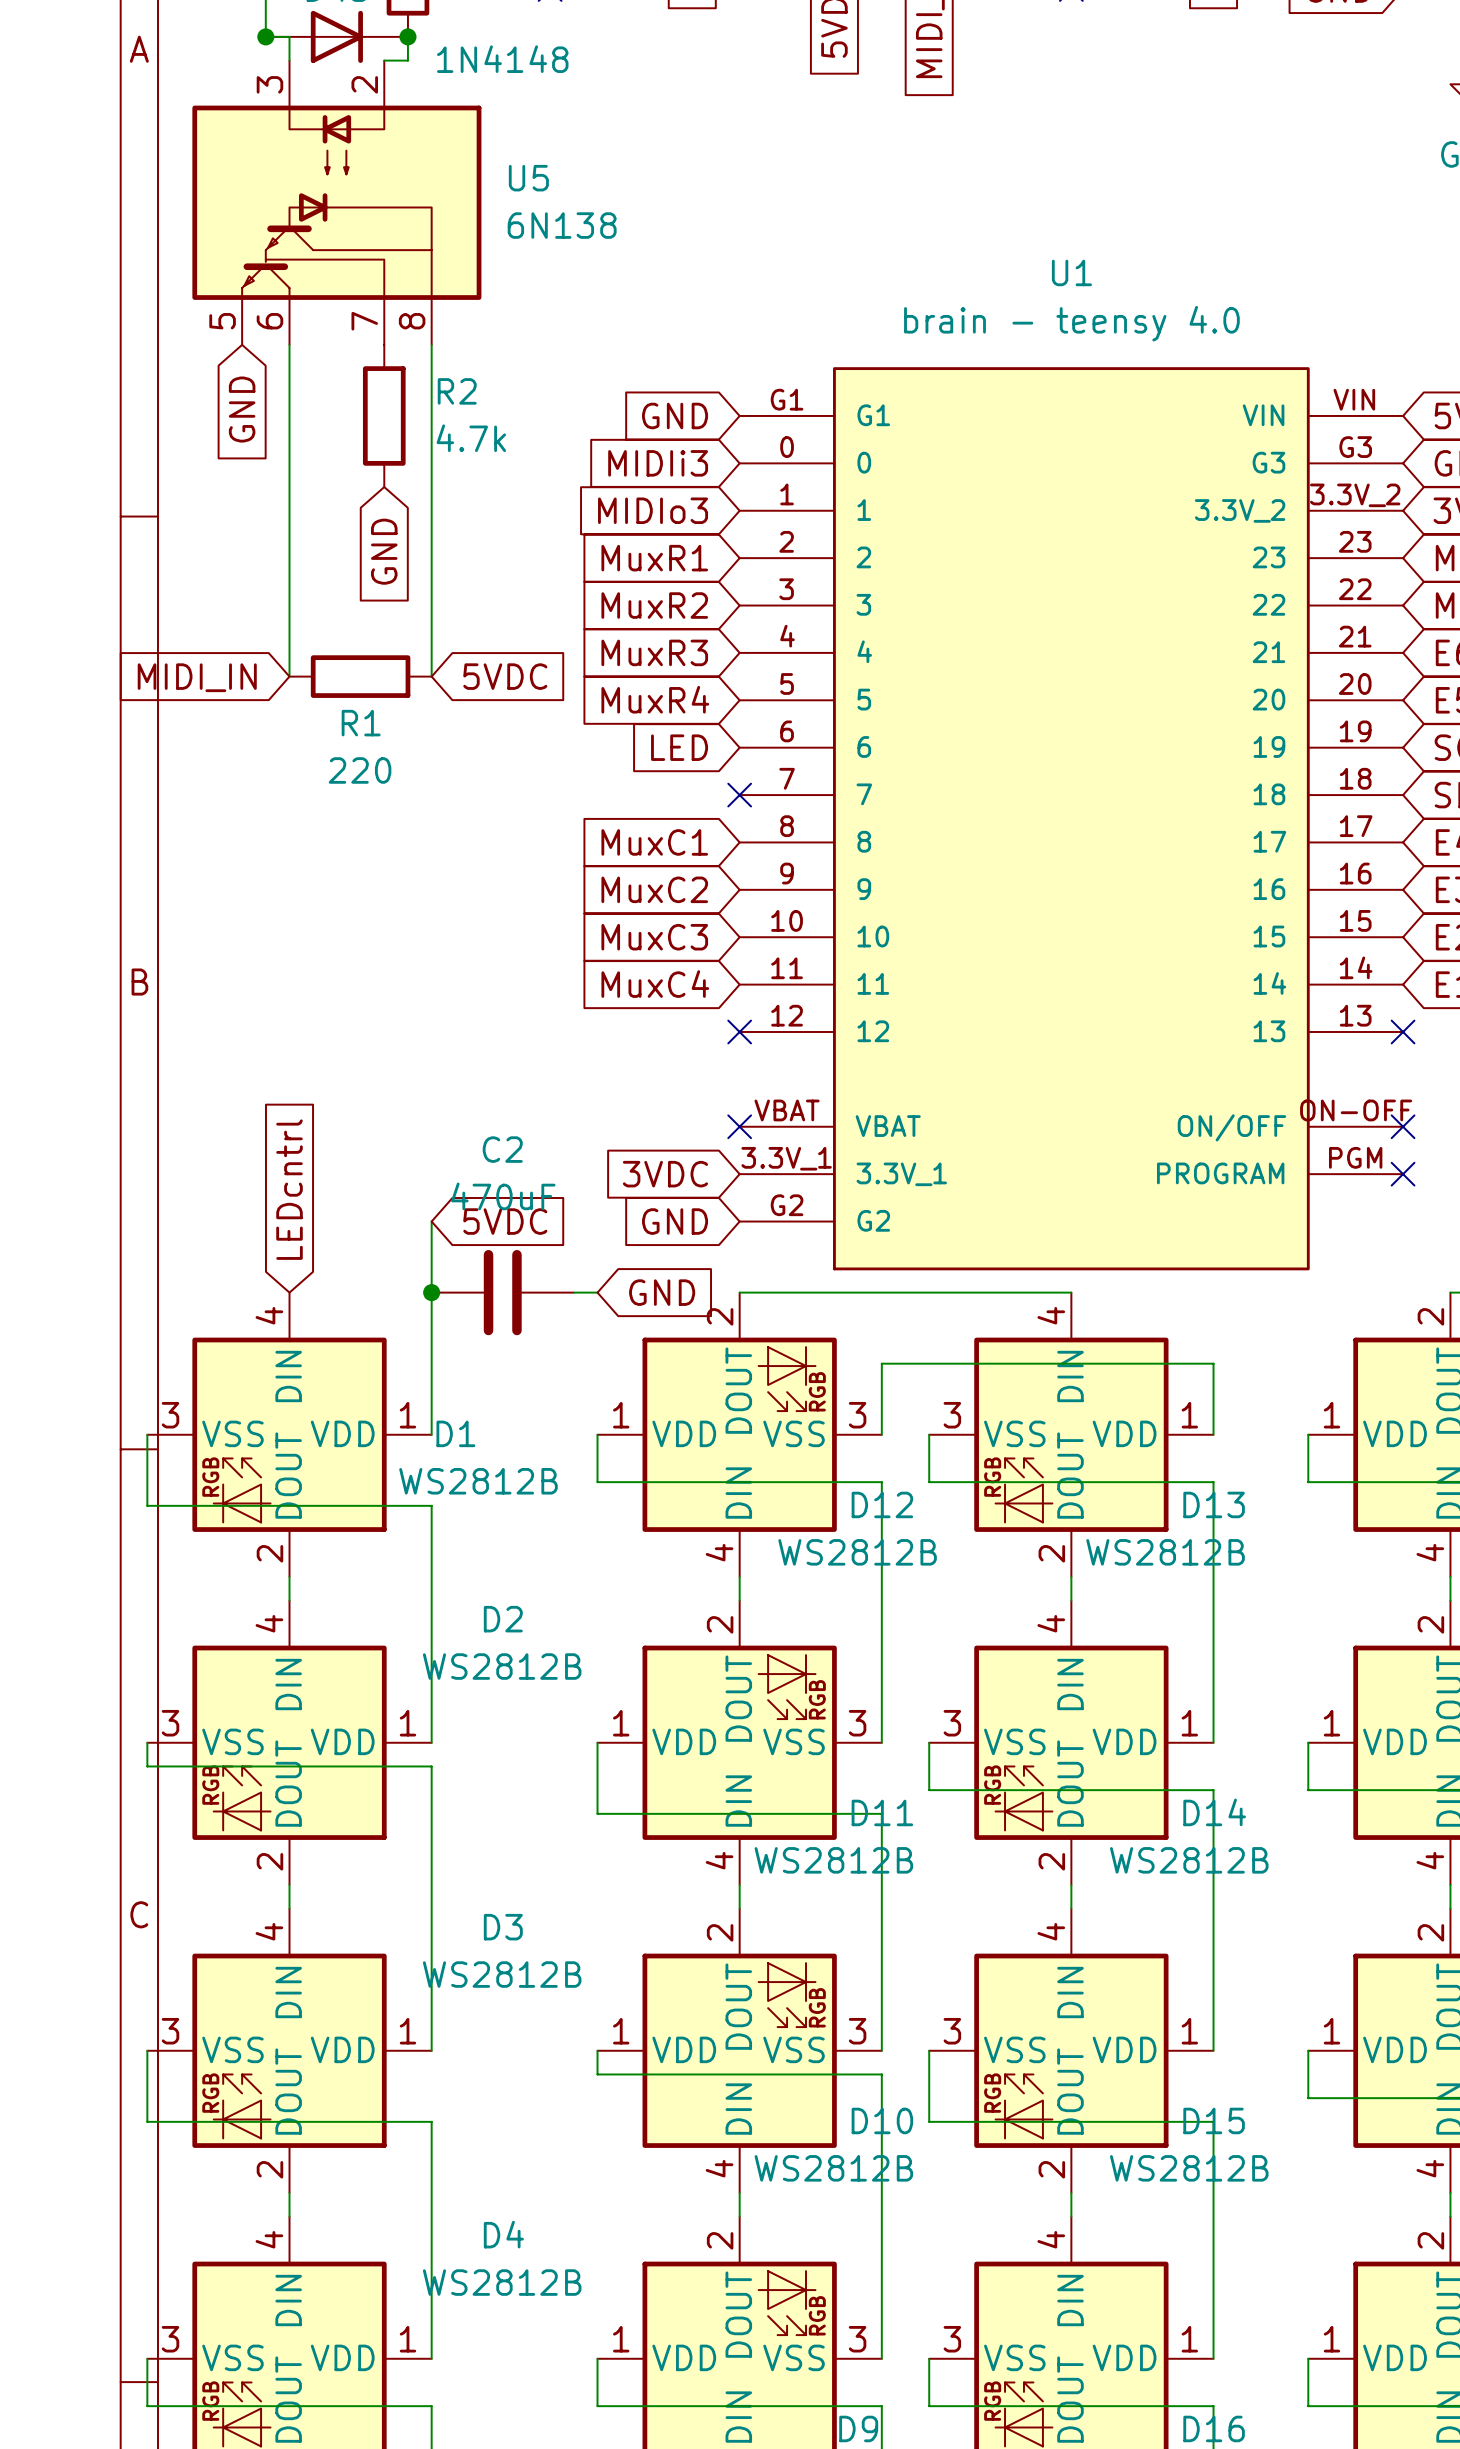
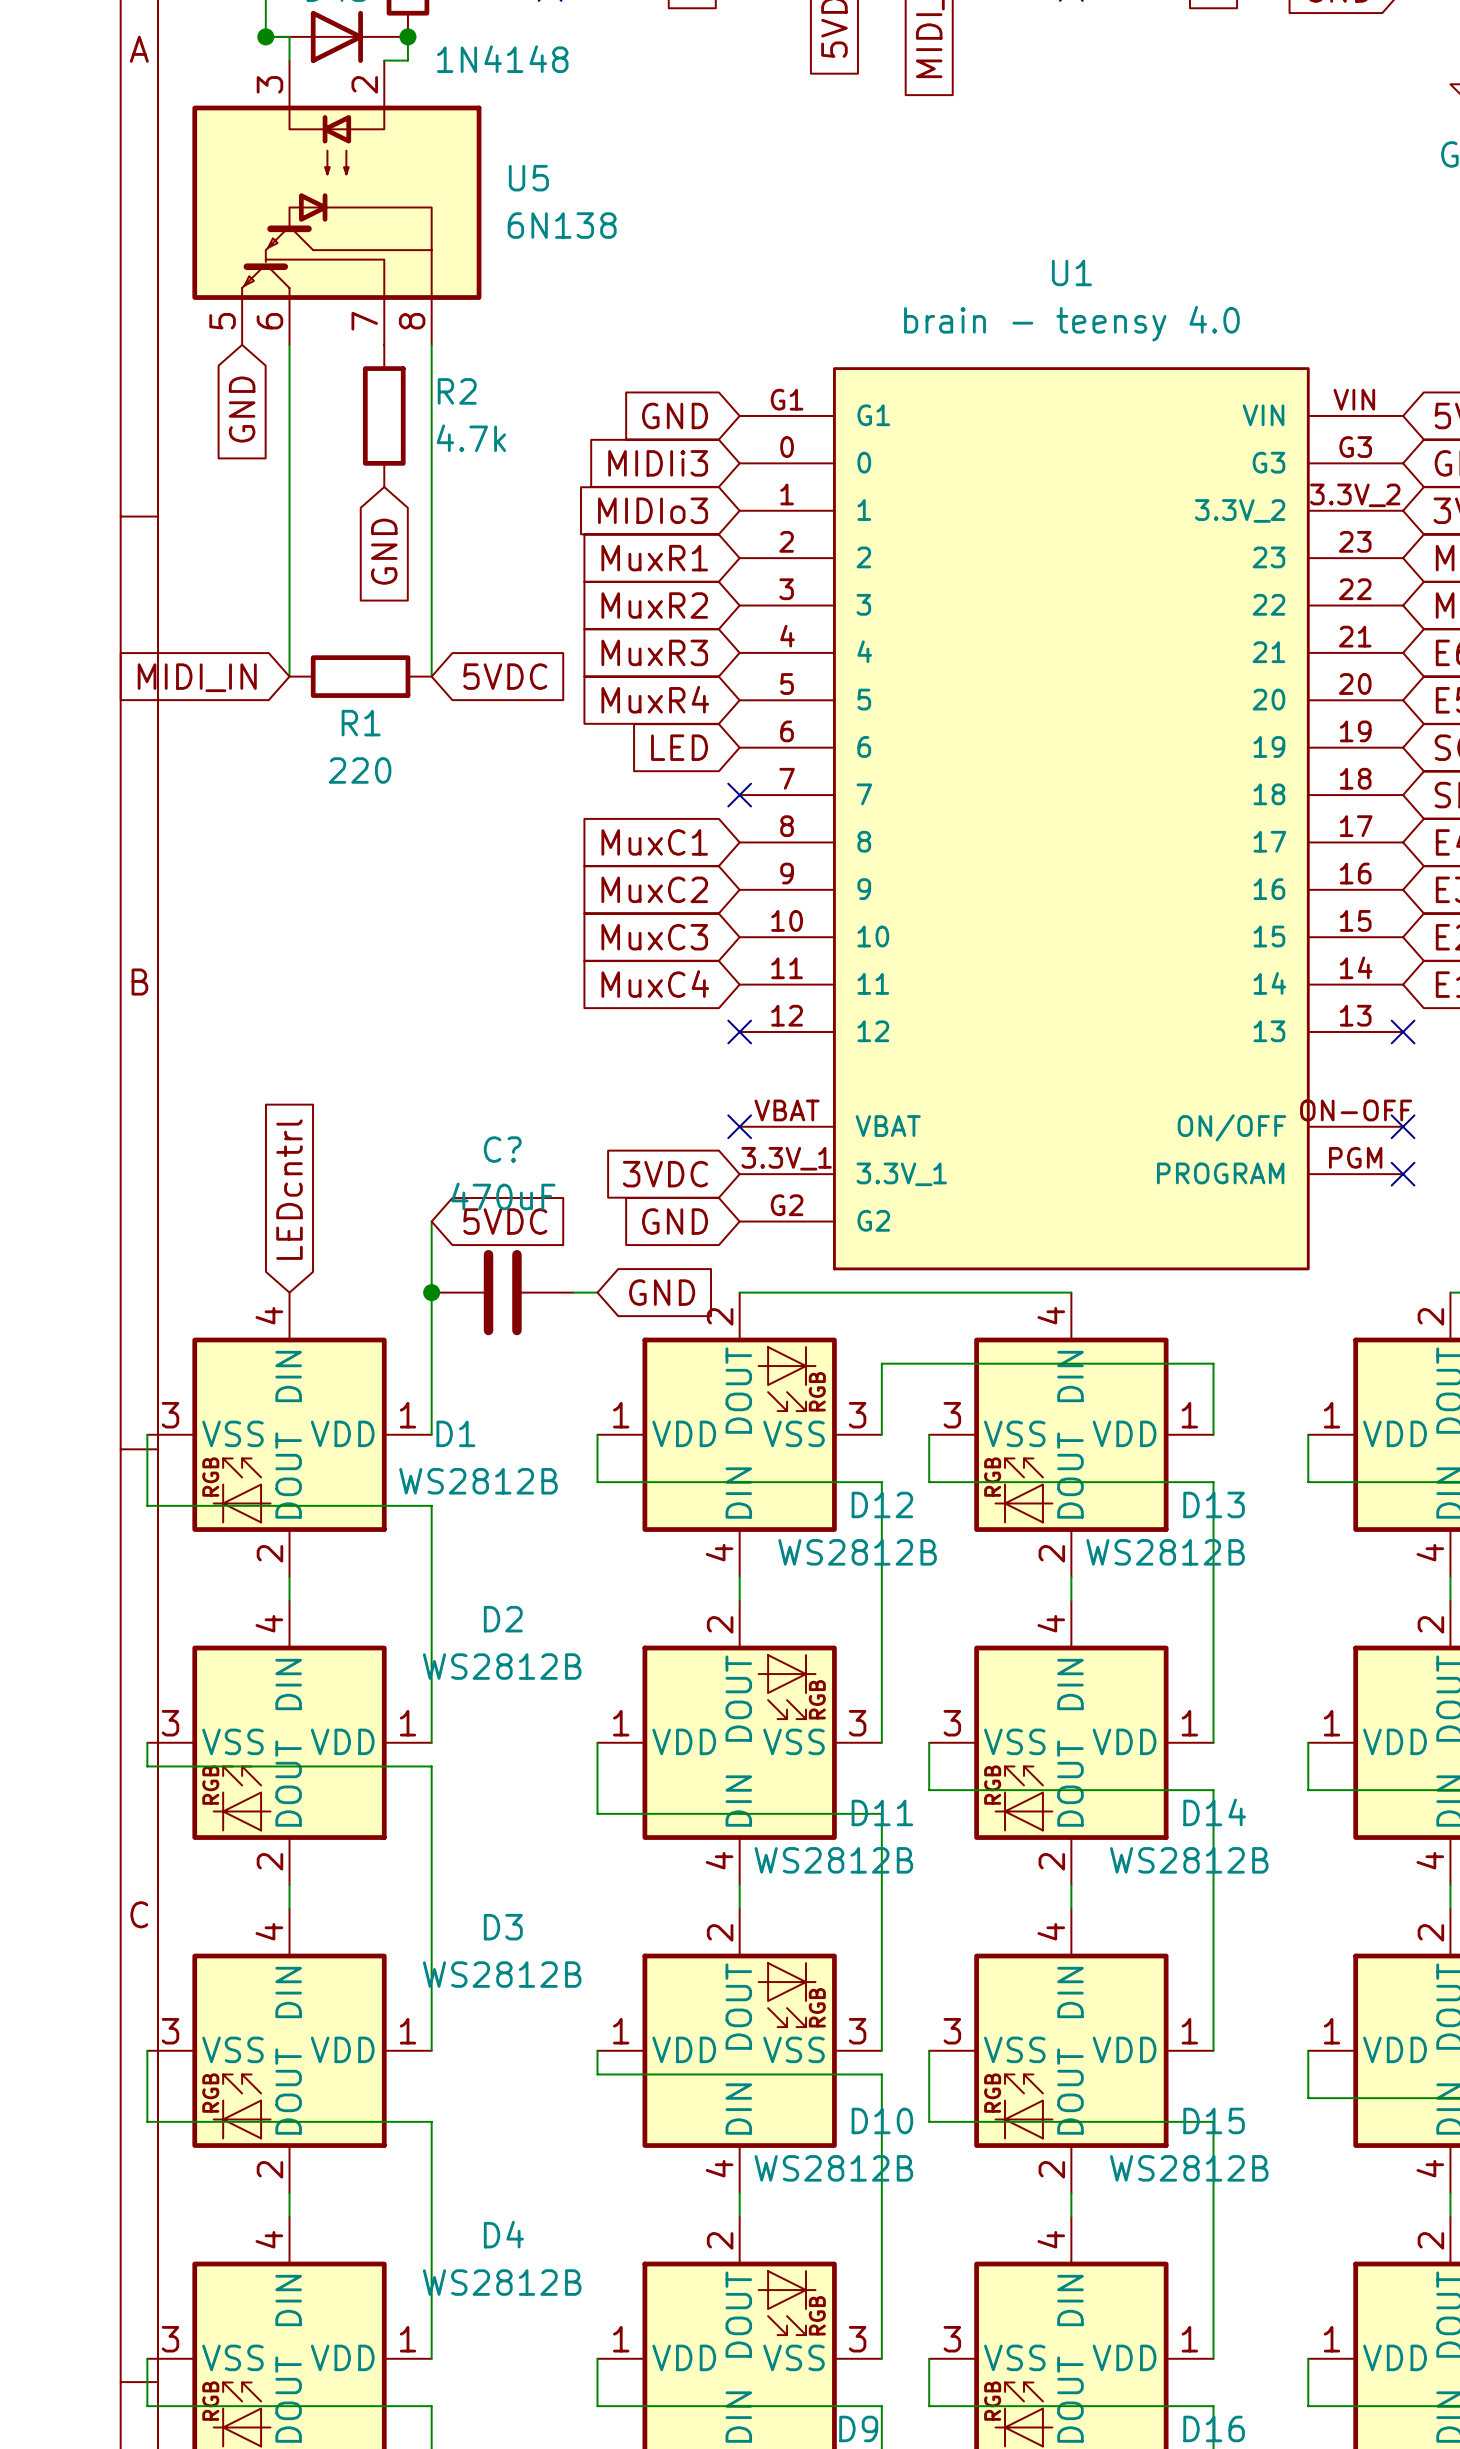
C2 name: C2 (502, 1149) -> C? (502, 1149)

